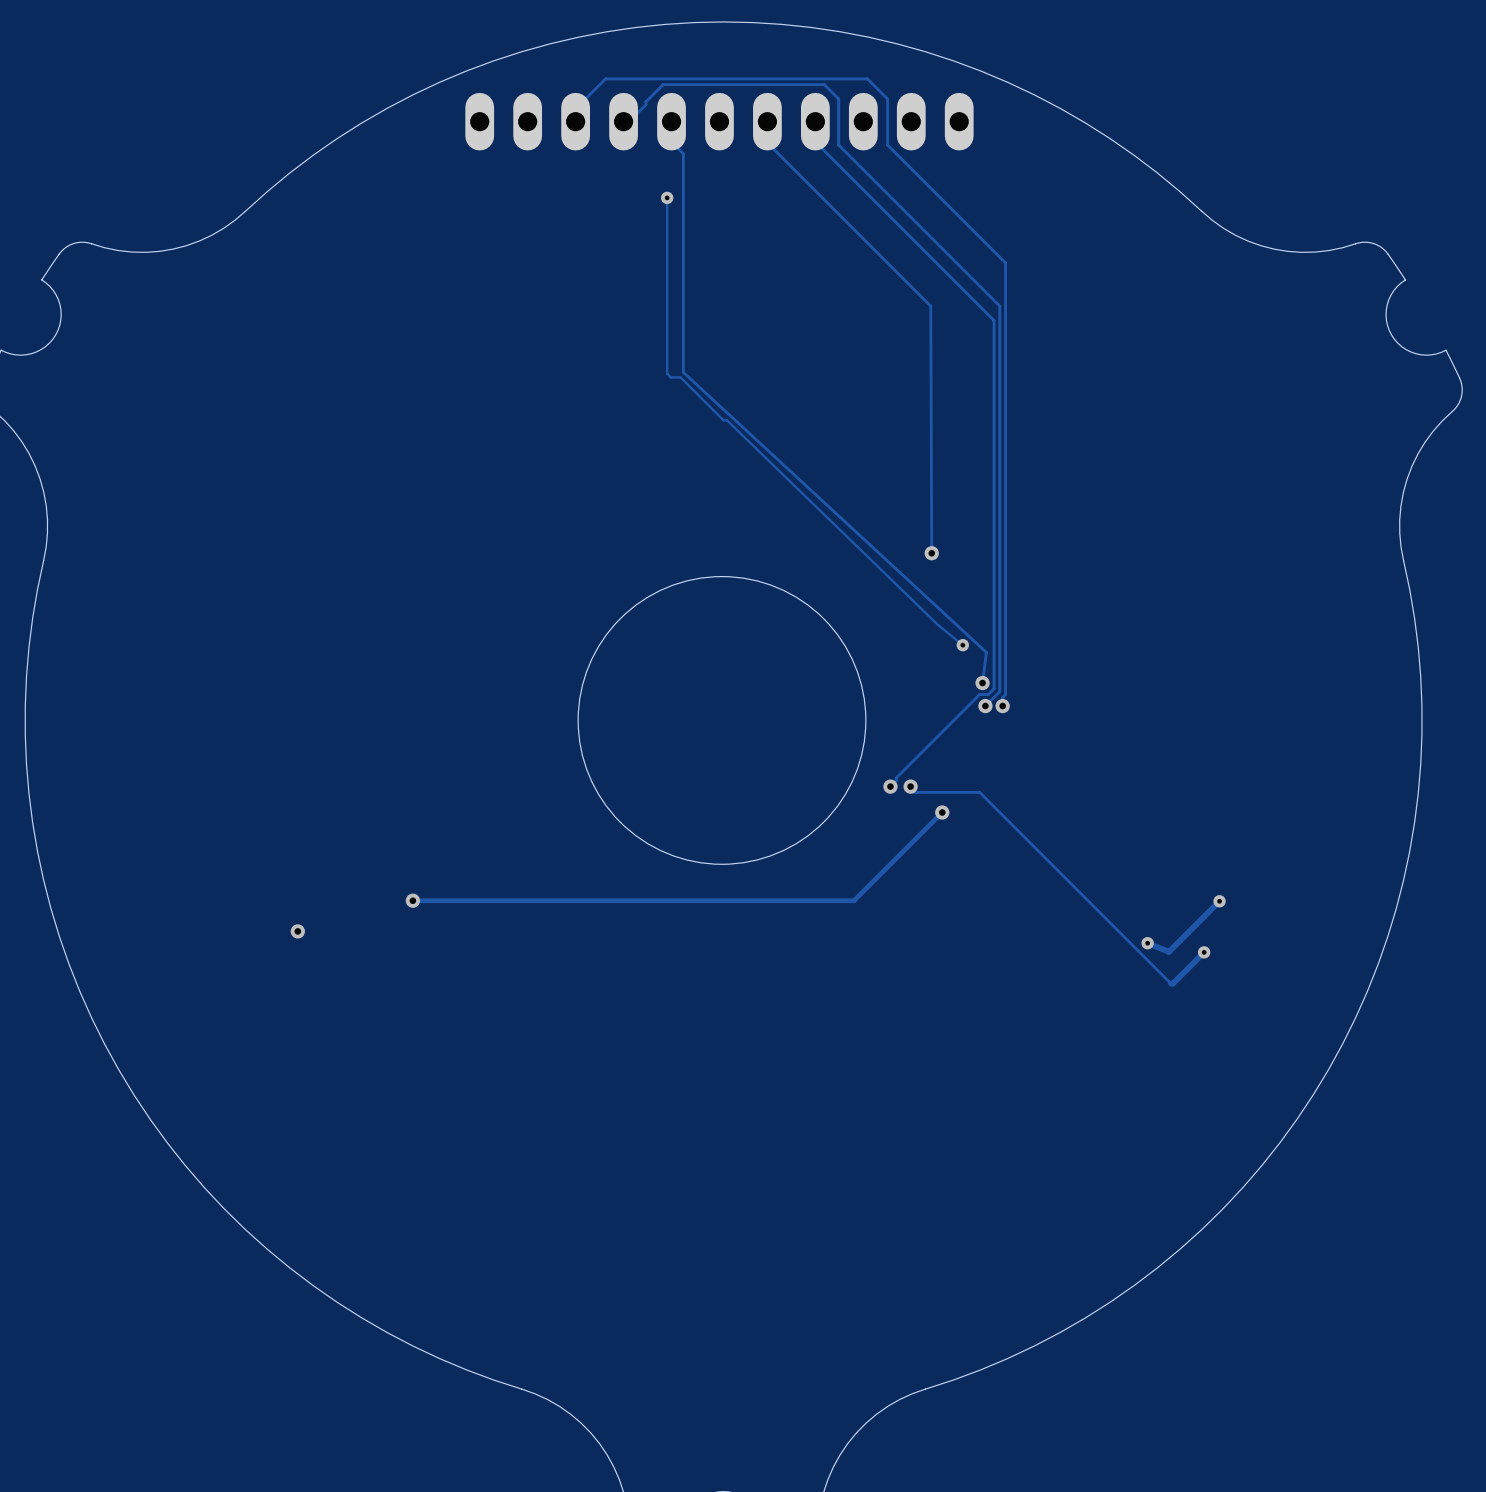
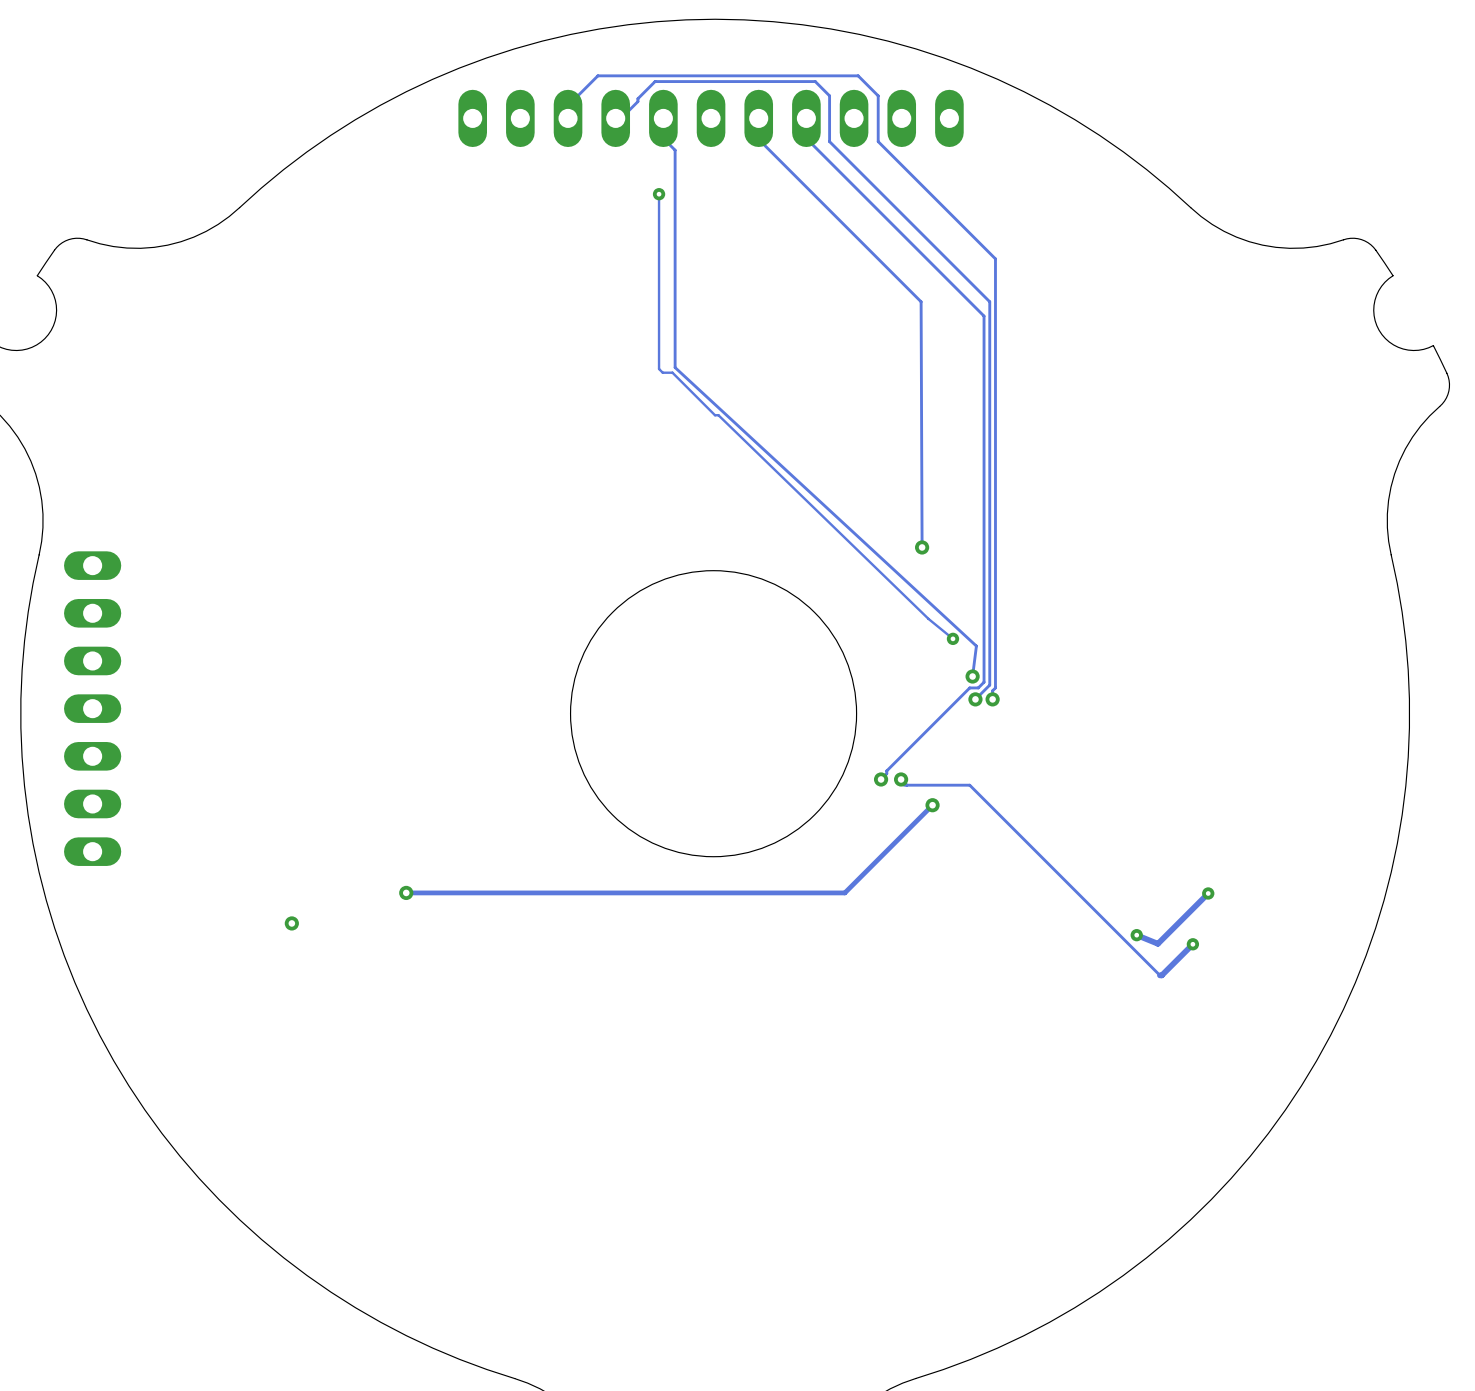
part: none -> (92, 708)

